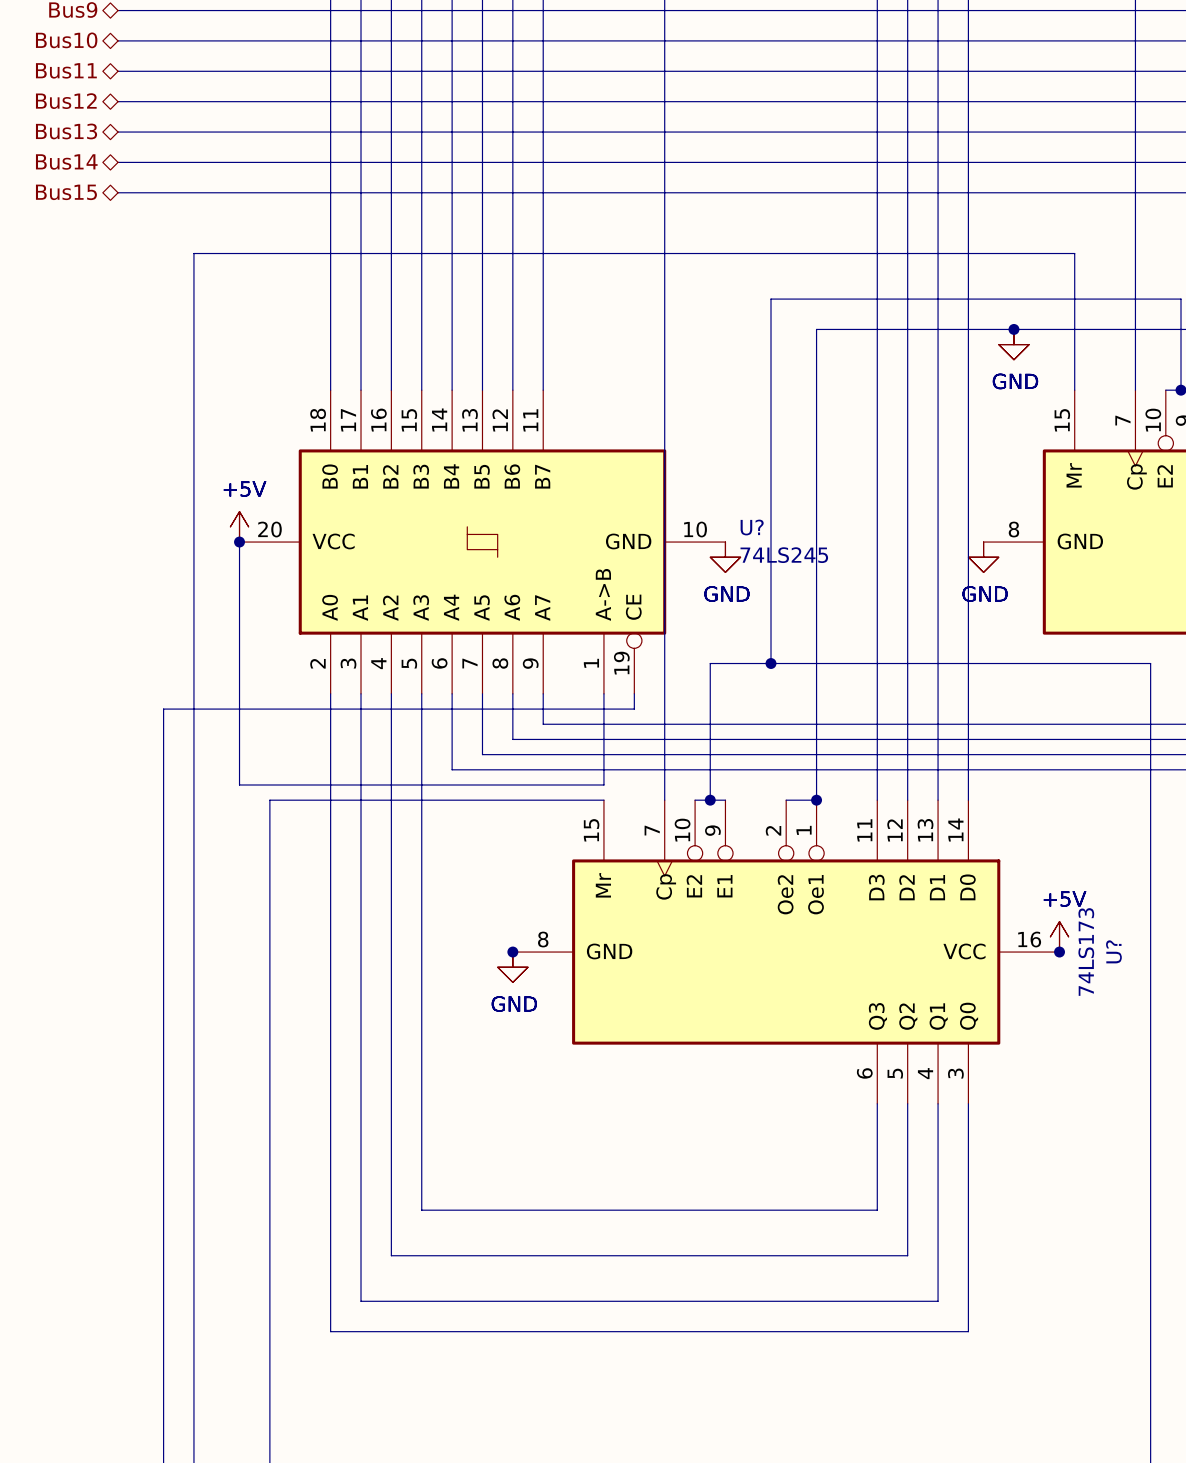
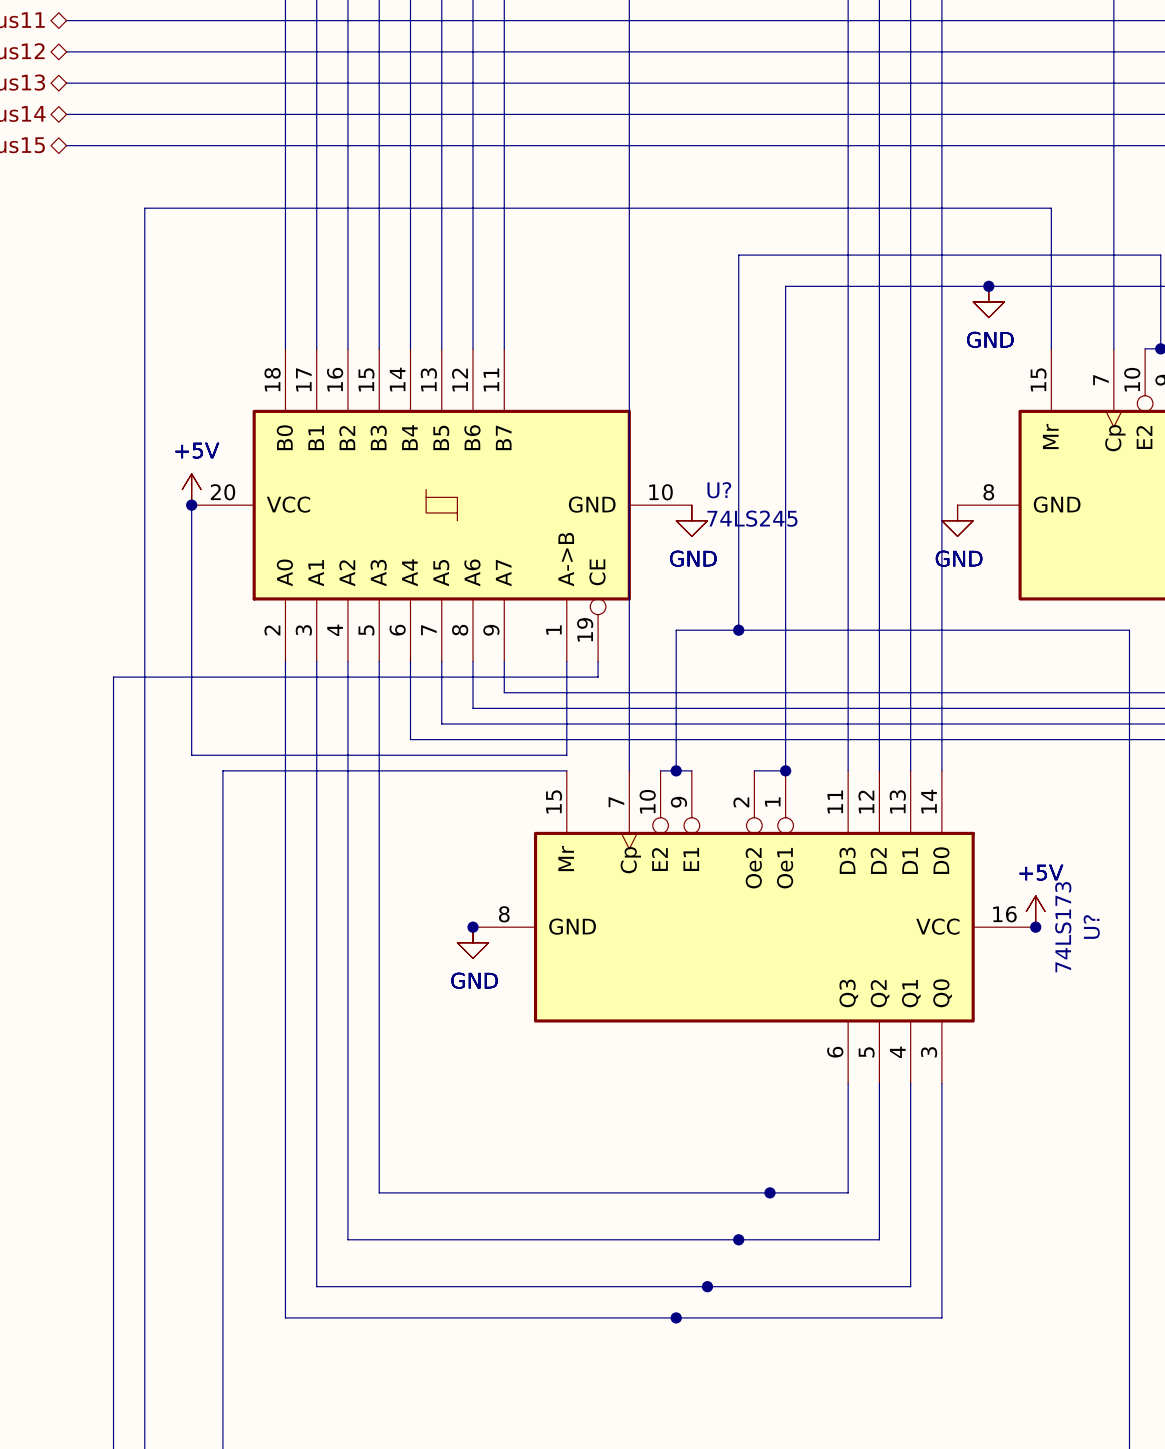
junction: none -> (769, 1192)
junction: none -> (738, 1239)
junction: none -> (707, 1286)
junction: none -> (676, 1317)

